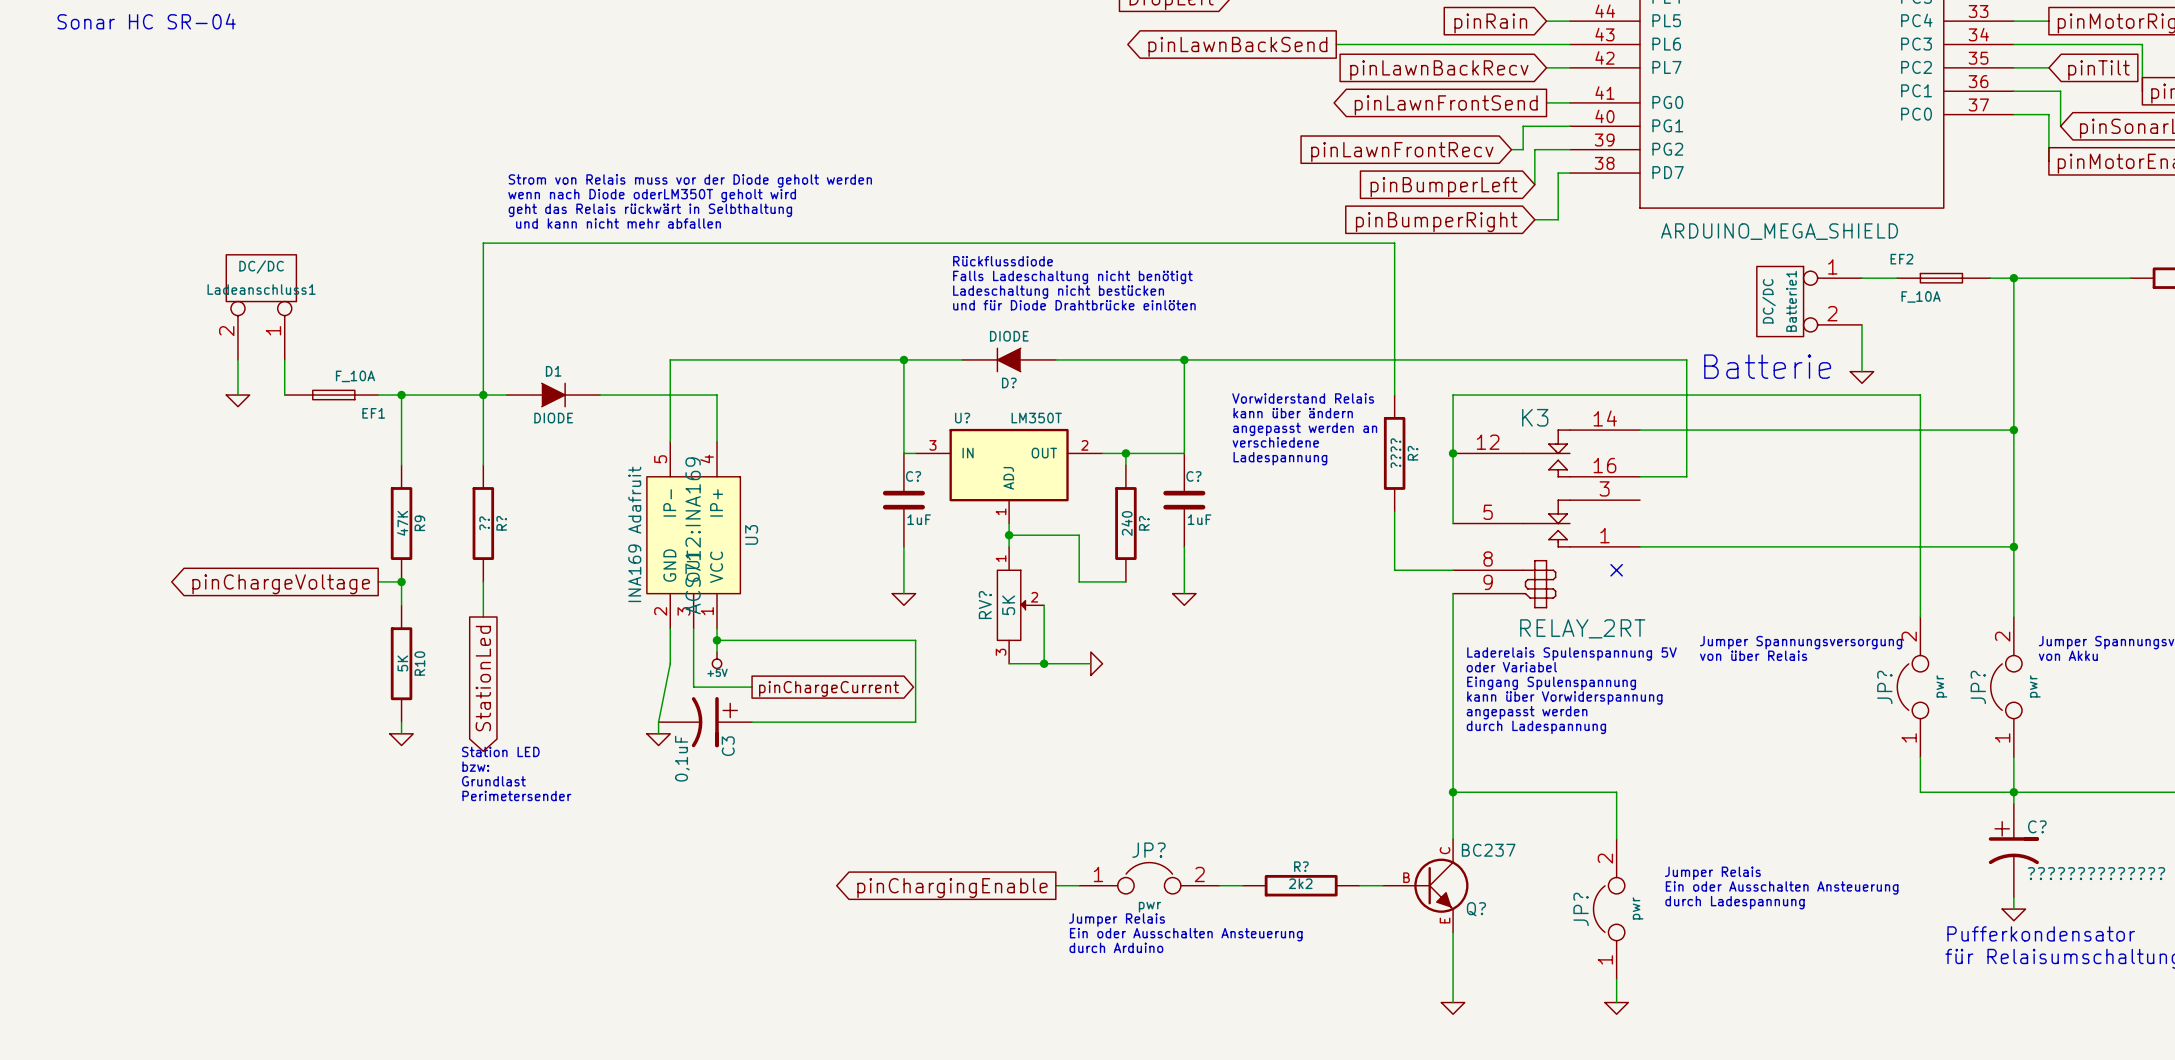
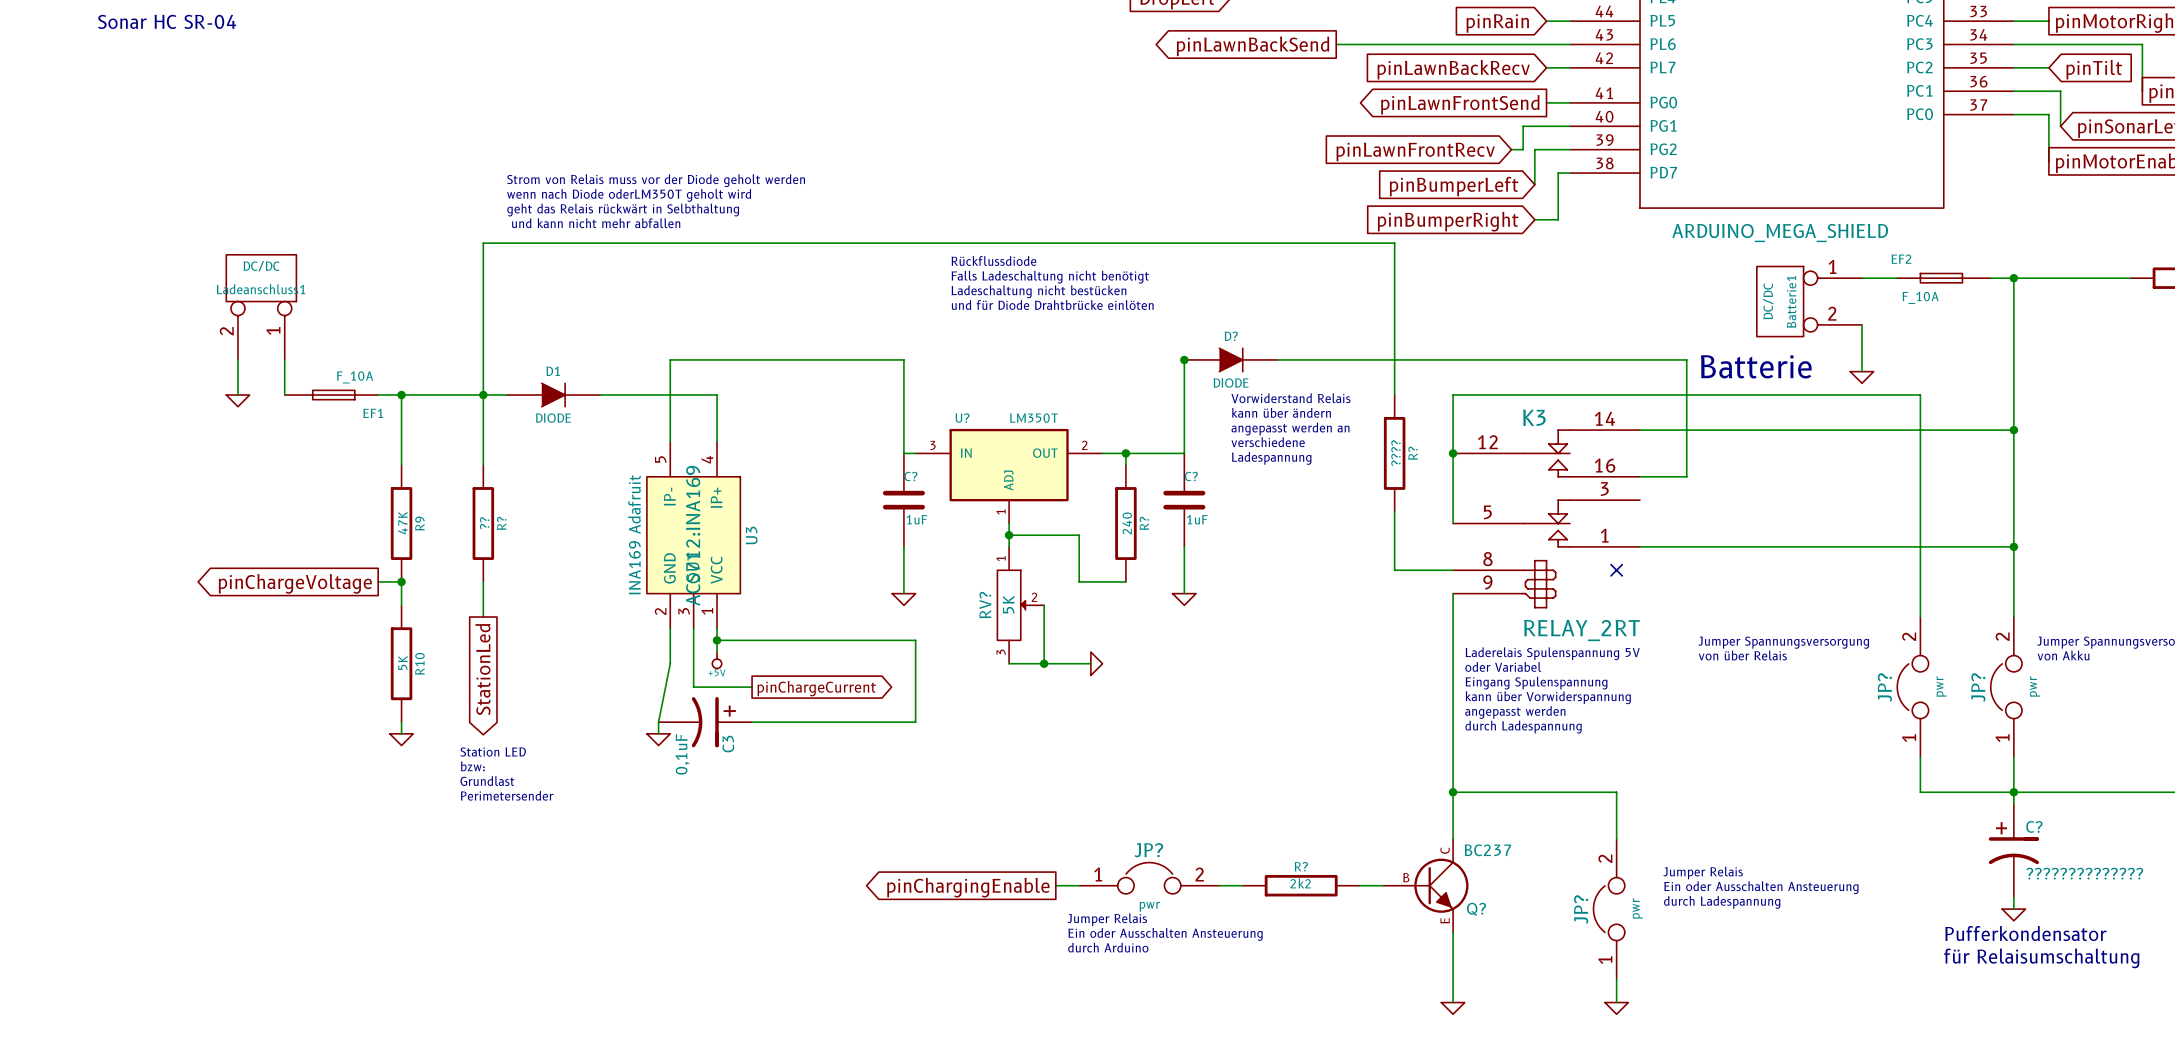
wire: (903, 359) (962, 359) -> none
junction: (903, 359) -> none
D? rotation: 0° (1008, 359) -> 180° (1231, 359)
D? position: (1009, 359) -> (1231, 359)
wire: (1055, 359) (1277, 359) -> none

